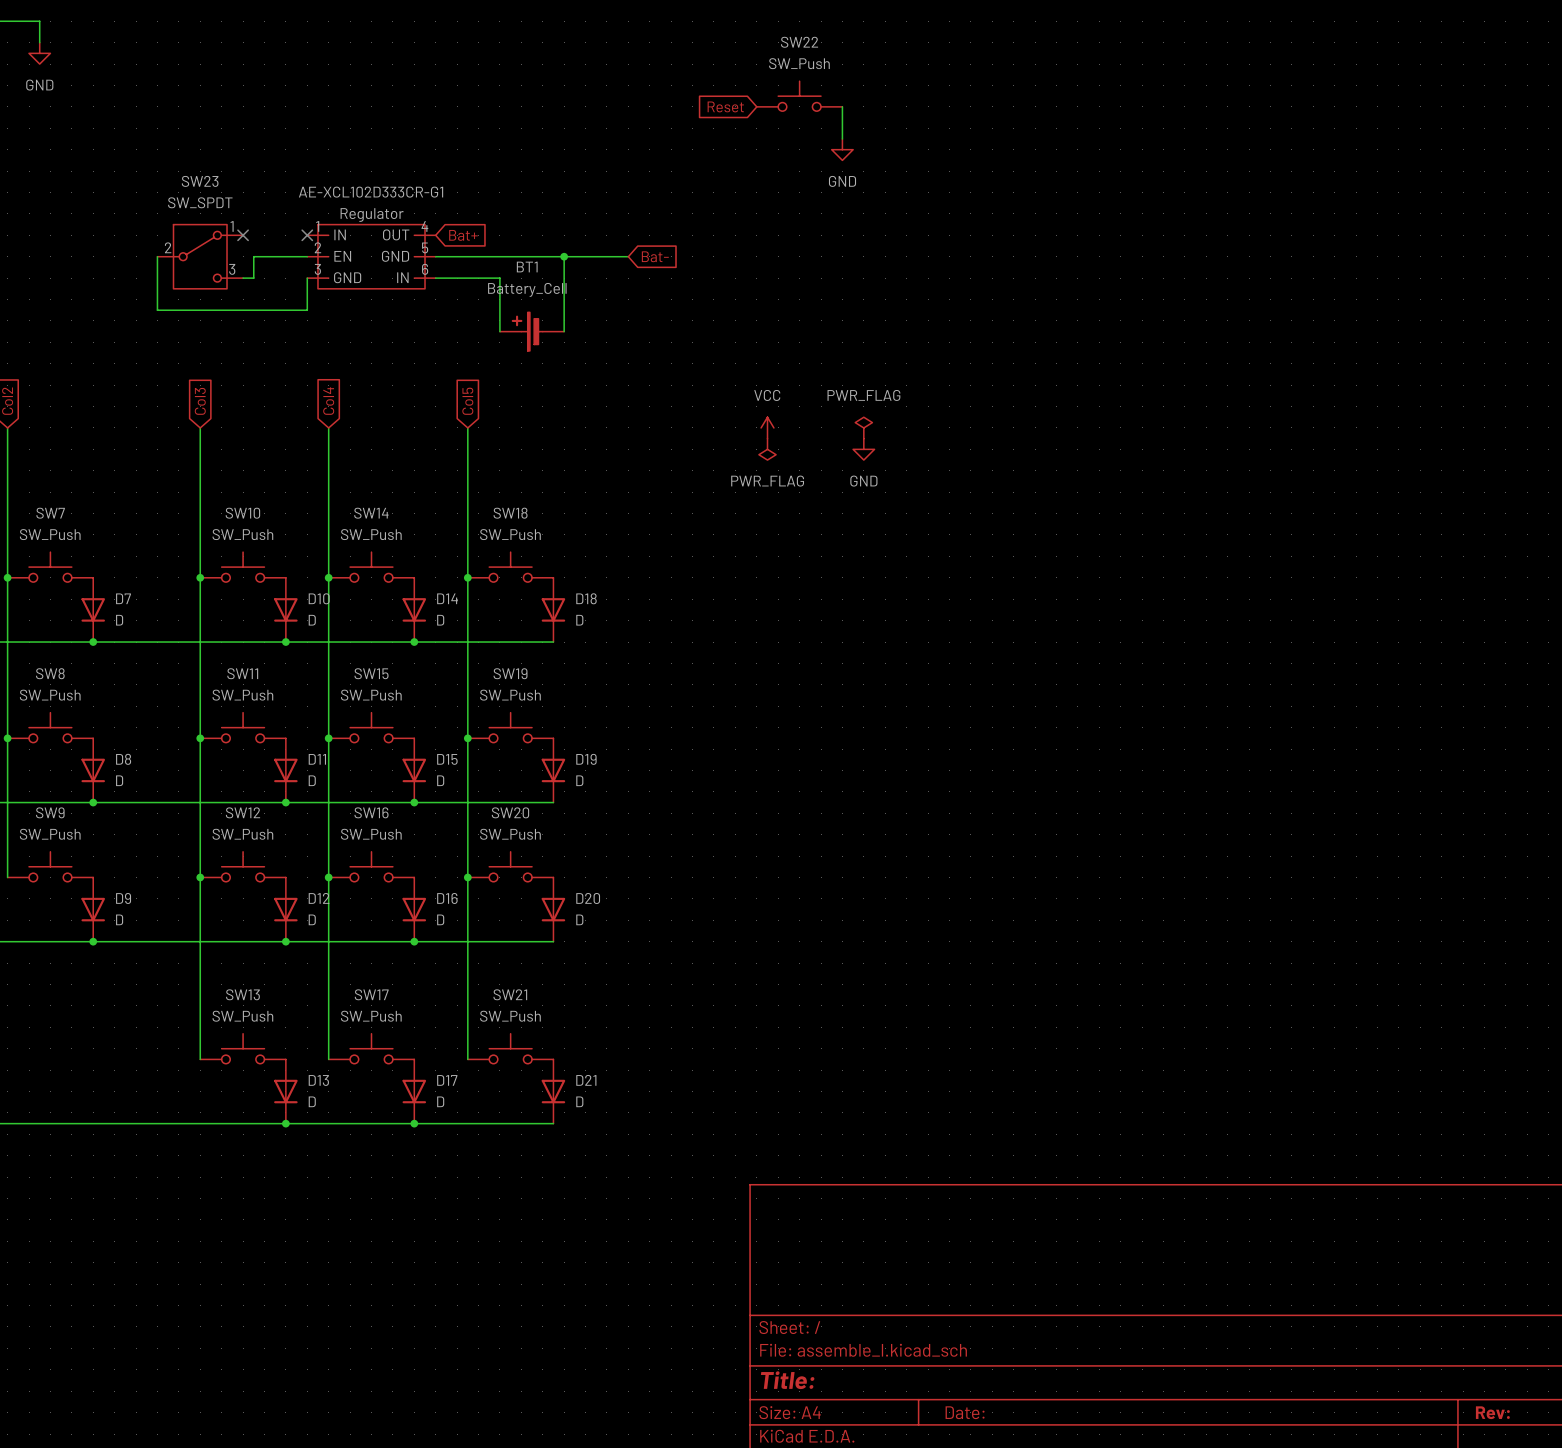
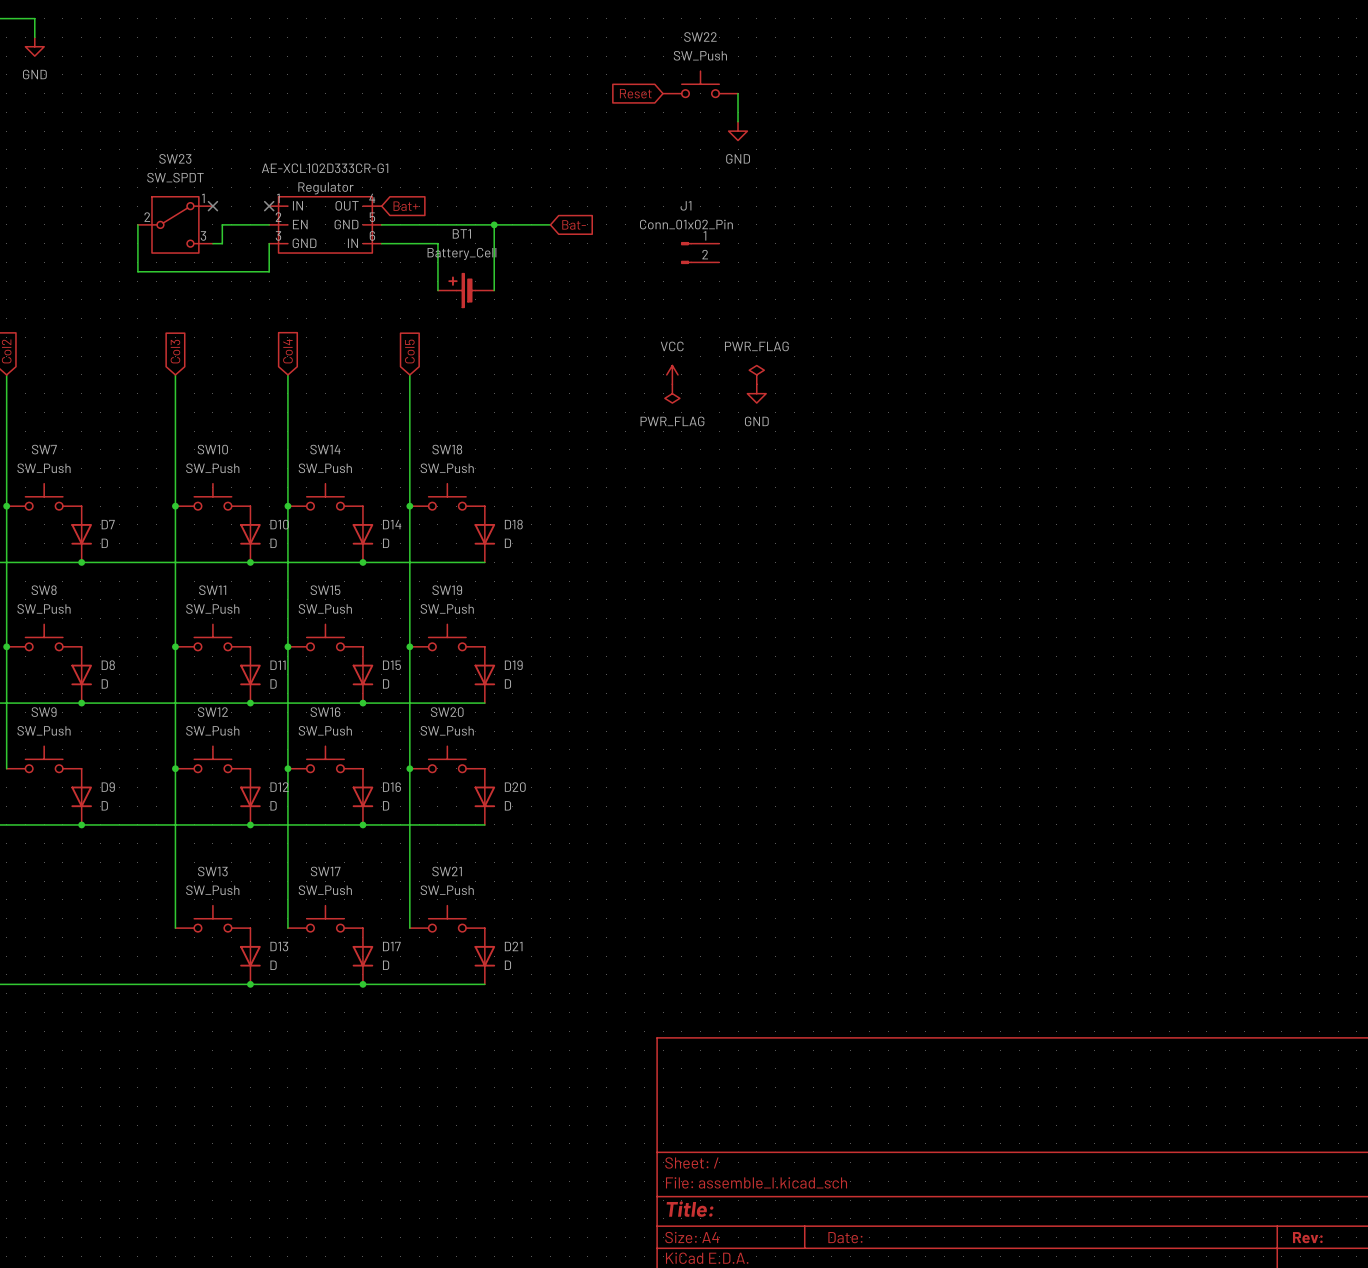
J1: none -> Conn_01x02_Pin (700, 253)

